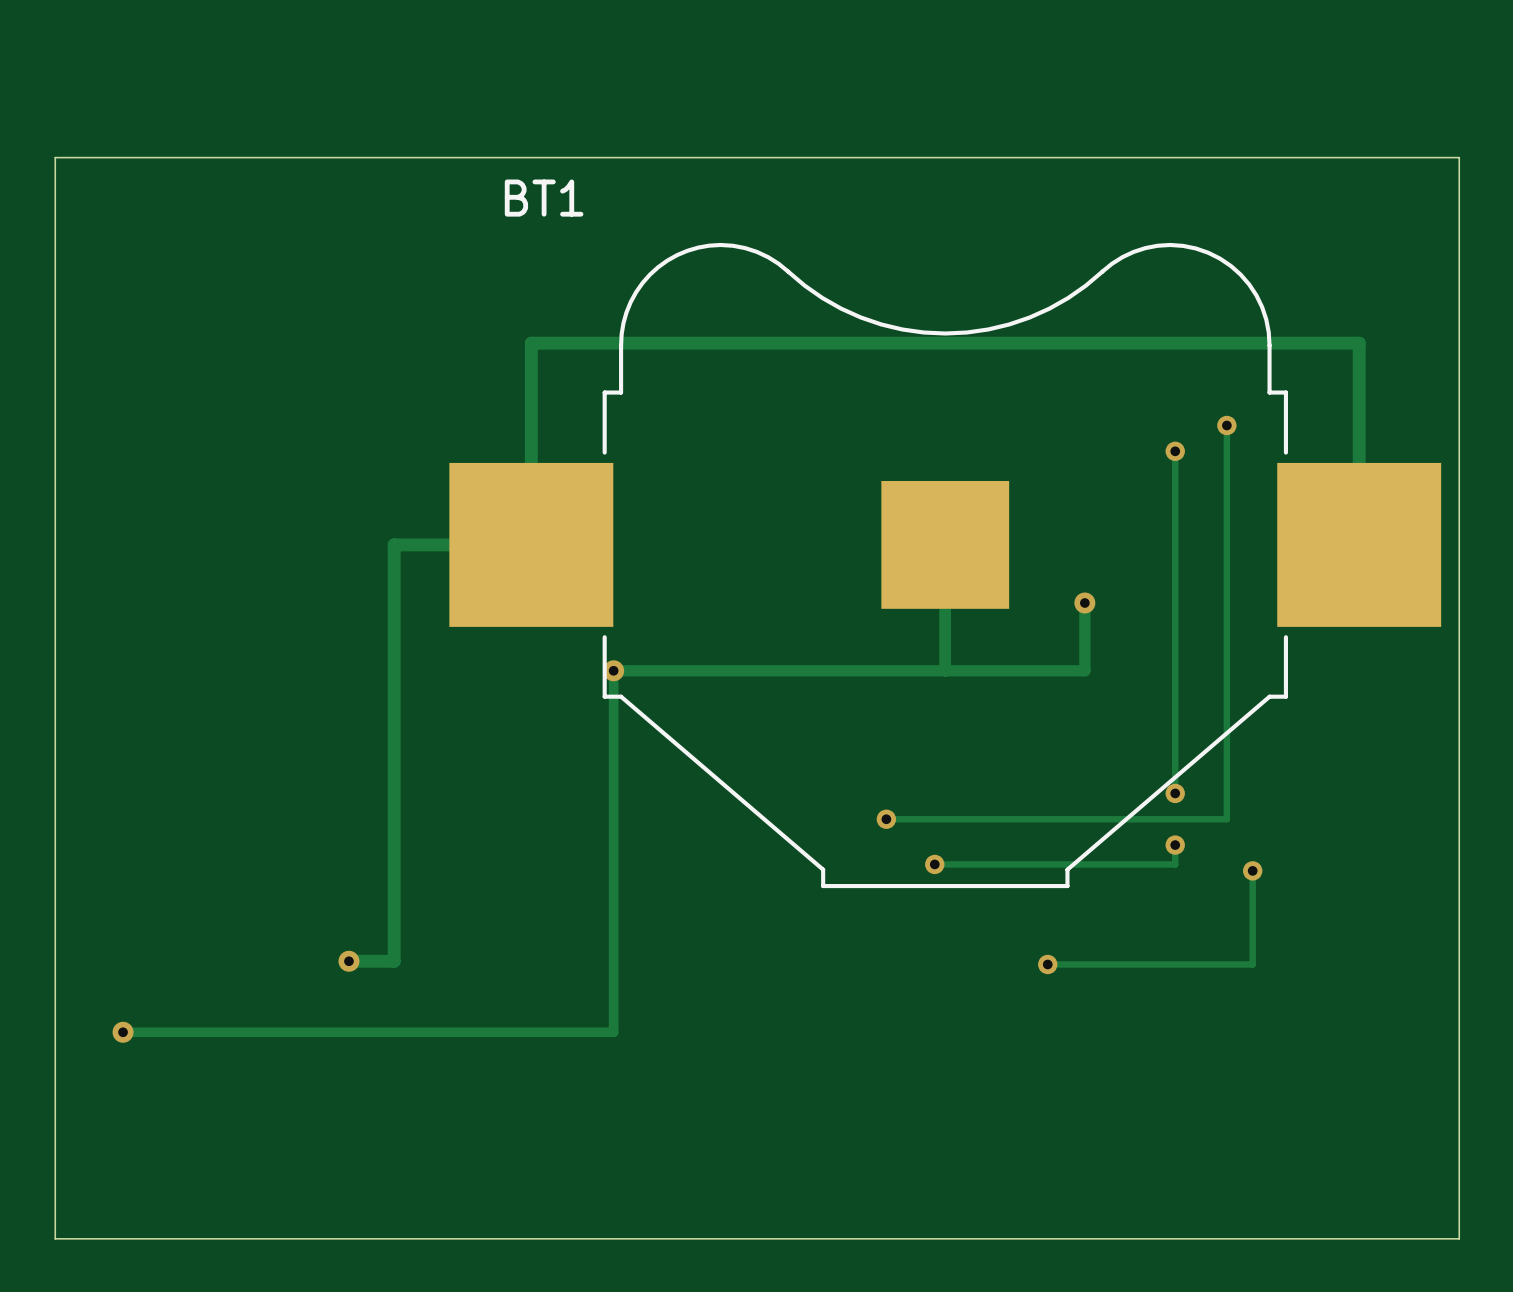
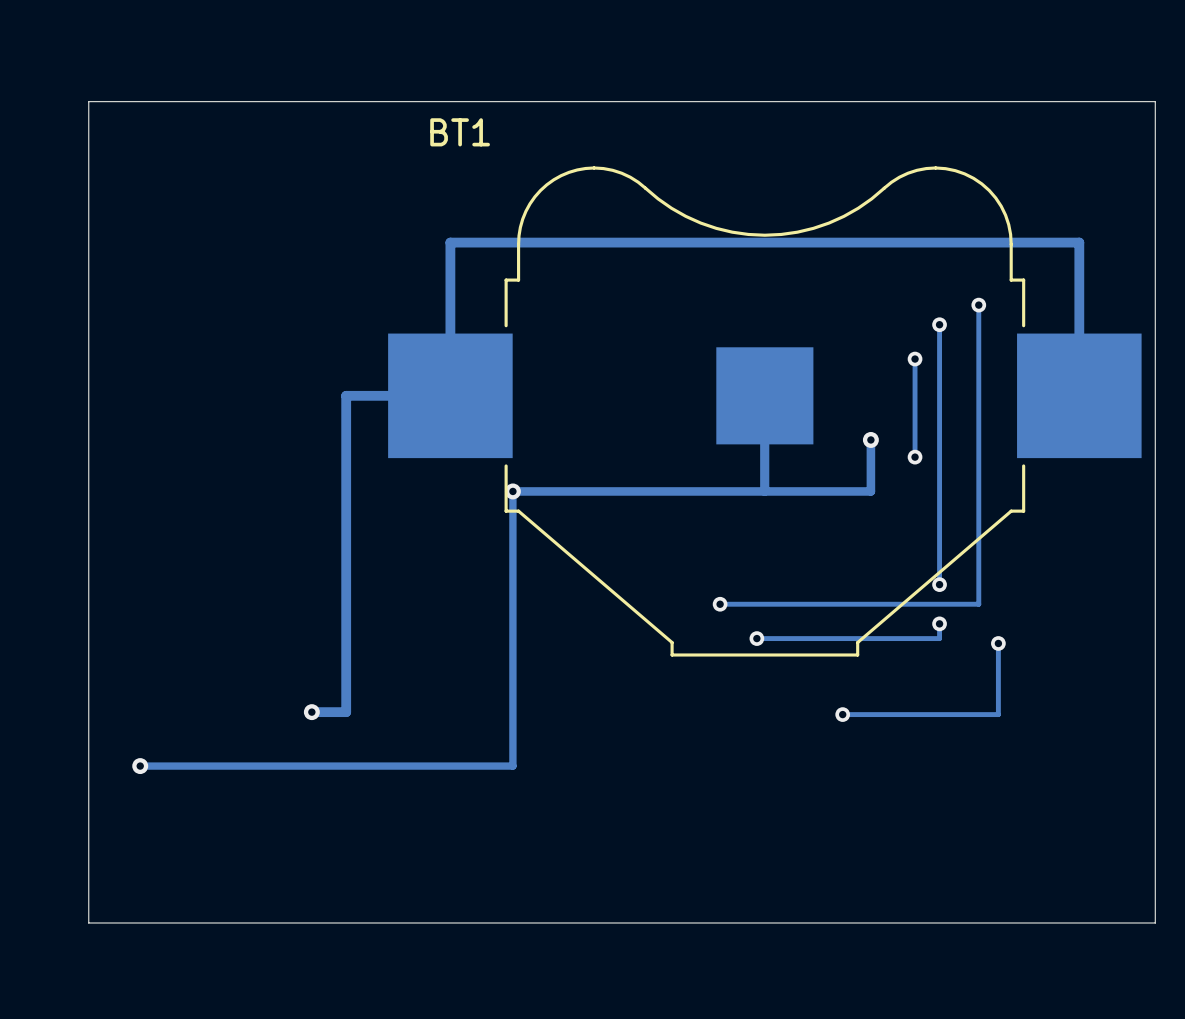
track: none -> (915, 359) (915, 457)
via: none -> (915, 359)
via: none -> (915, 457)

